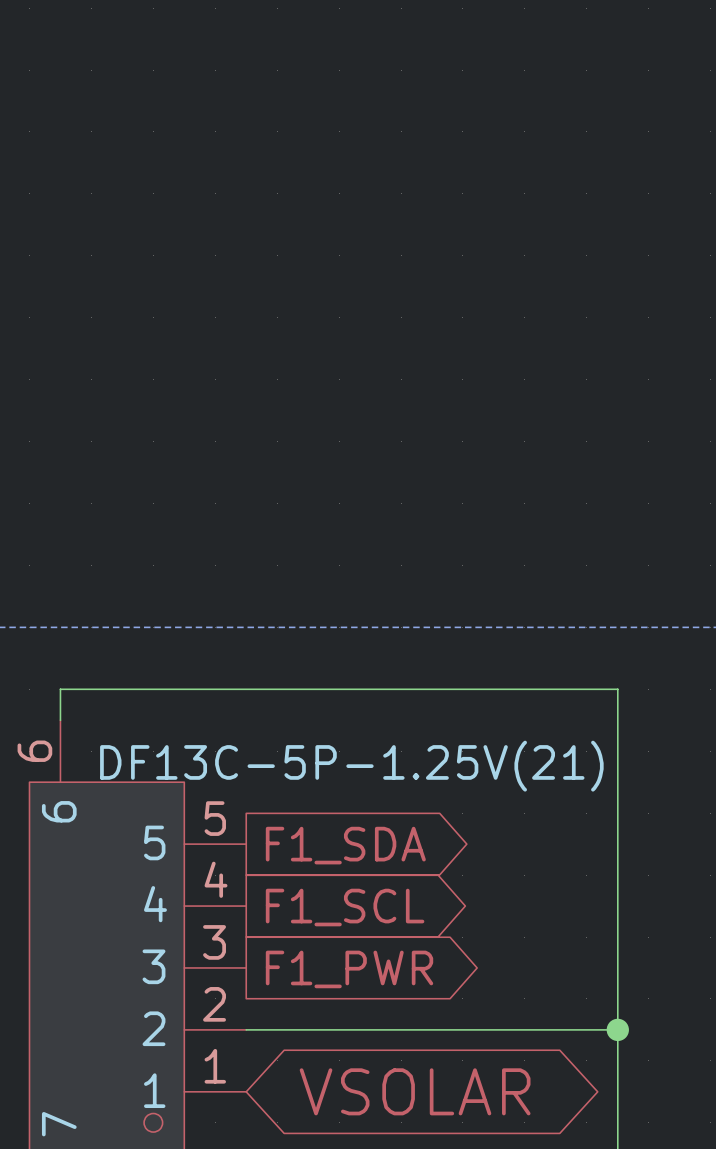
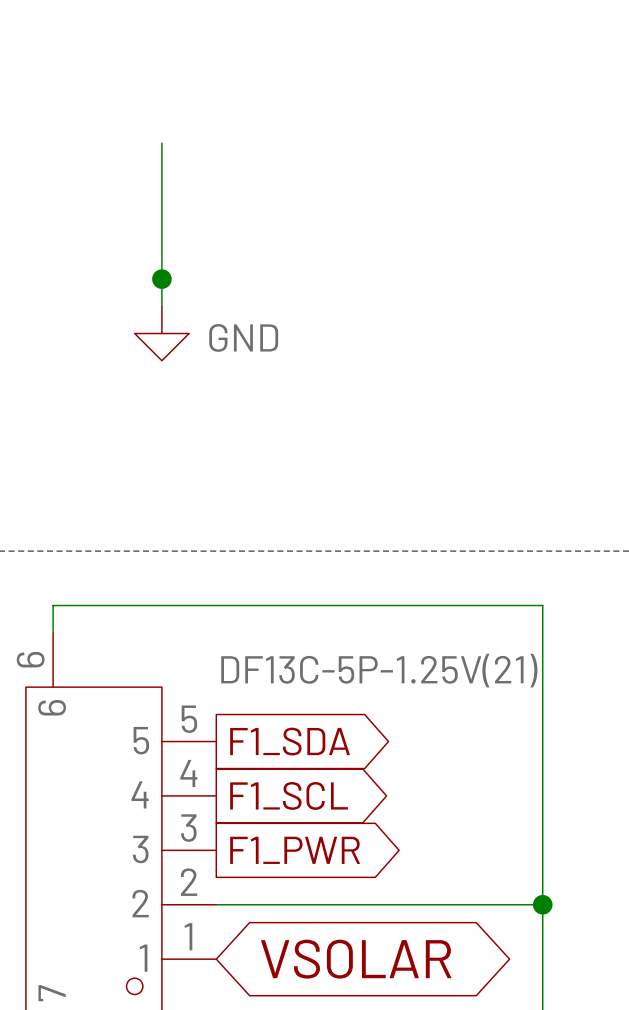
wire: none -> (161, 143) (161, 306)
junction: none -> (161, 279)
power symbol: none -> GND (161, 333)

